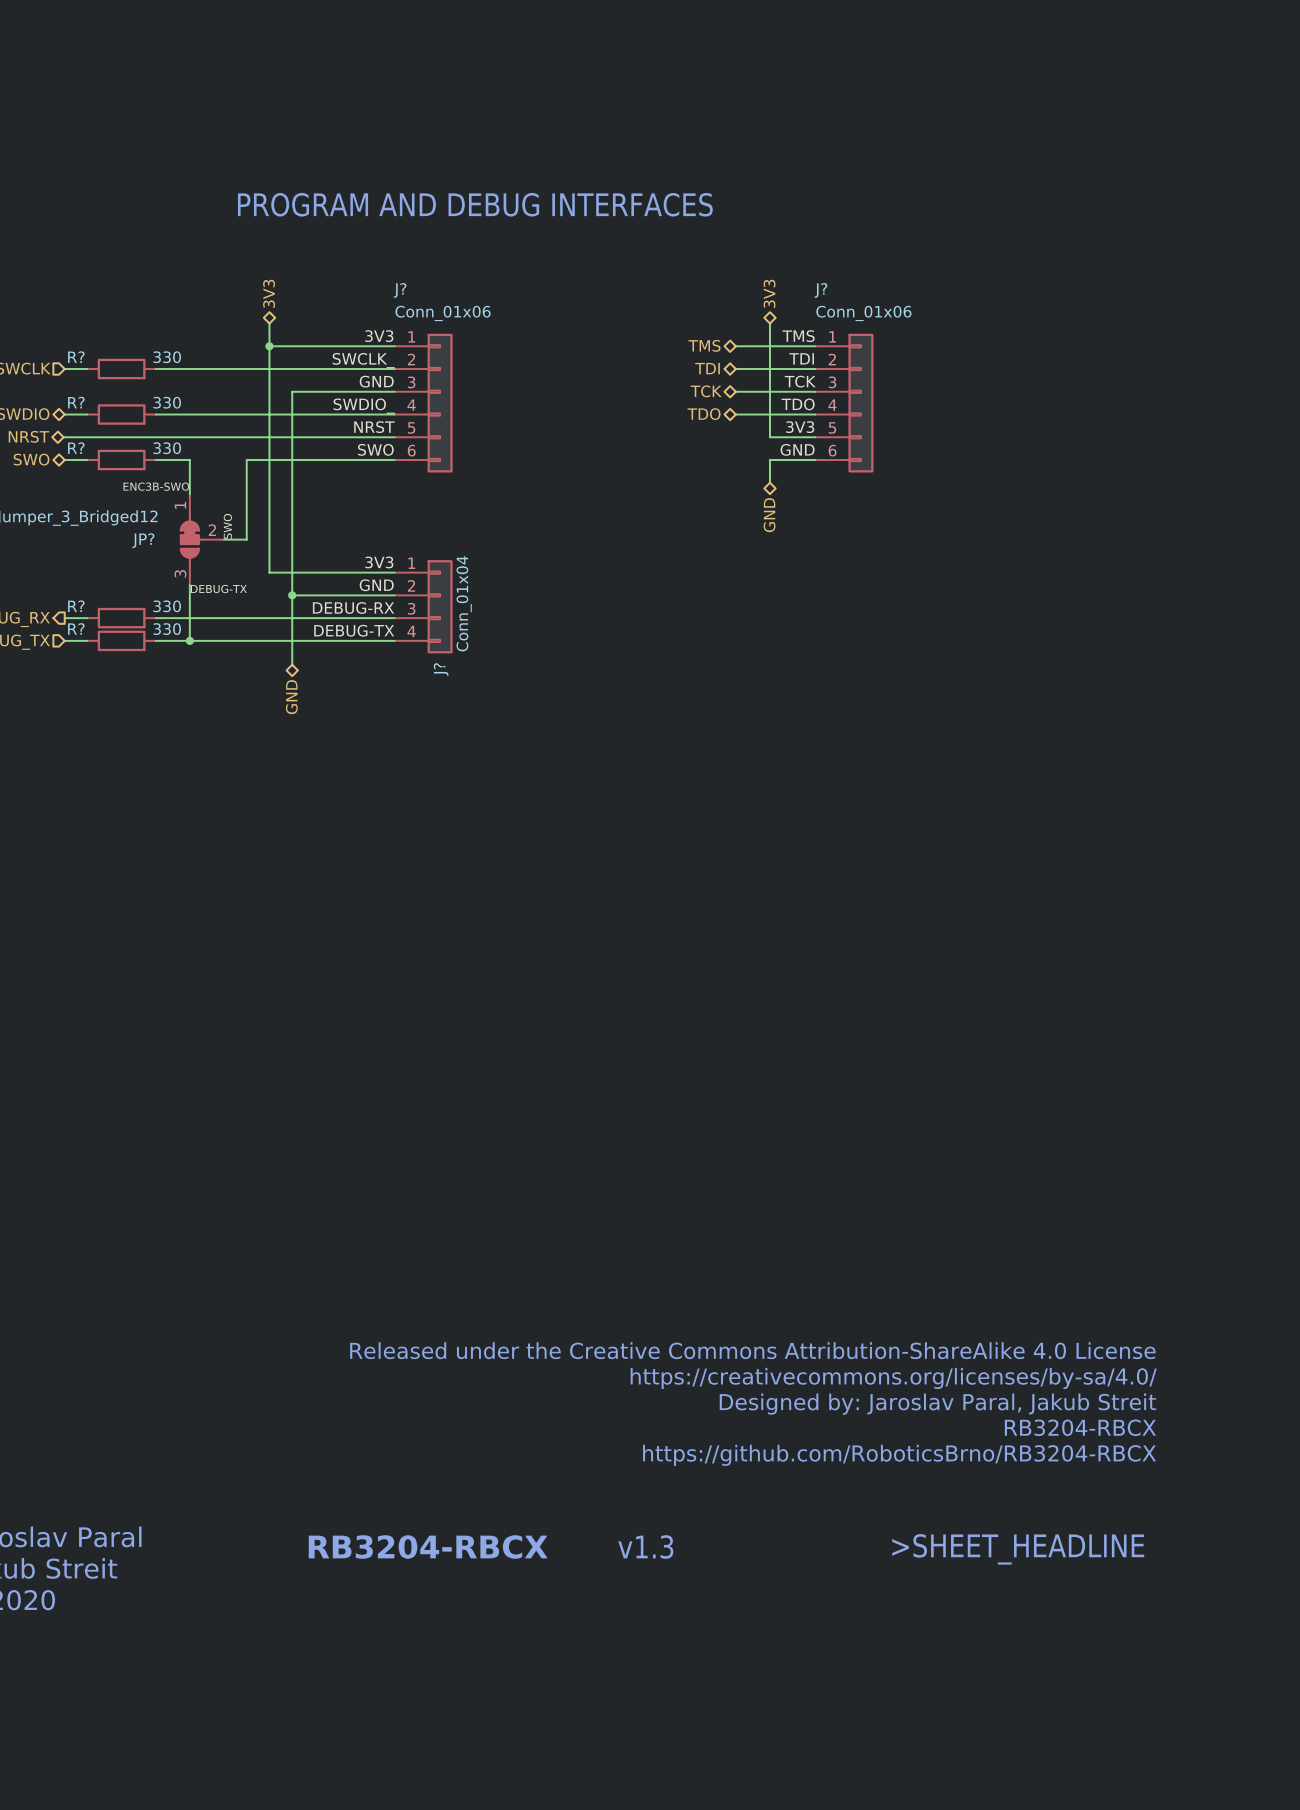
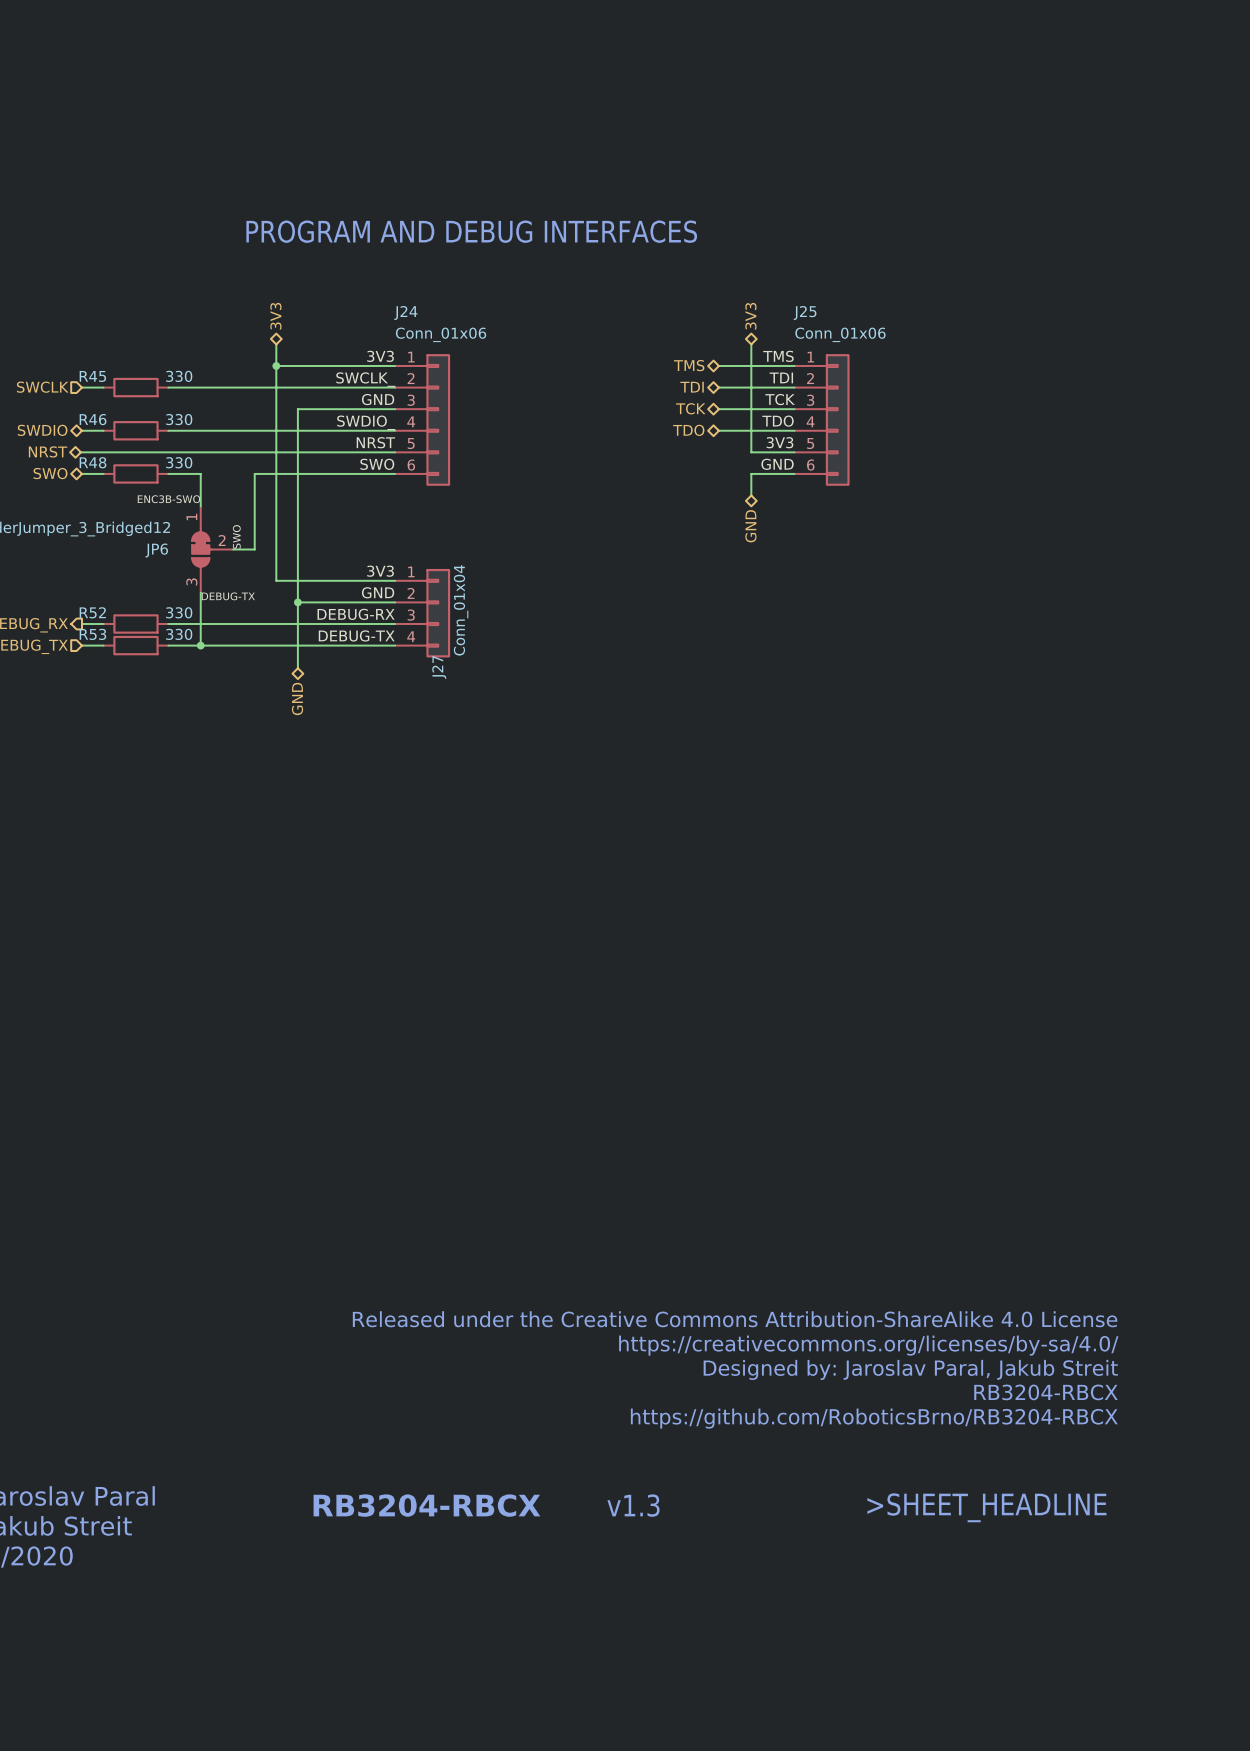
J? name: J? (400, 290) -> J24 (405, 312)
J? name: J? (820, 290) -> J25 (805, 312)
R? name: R? (76, 357) -> R45 (92, 376)
R? name: R? (76, 402) -> R46 (93, 419)
R? name: R? (76, 448) -> R48 (93, 462)
JP? name: JP? (143, 540) -> JP6 (156, 550)
R? name: R? (76, 606) -> R52 (92, 612)
R? name: R? (76, 628) -> R53 (92, 634)
J? name: J? (441, 669) -> J27 (439, 667)

